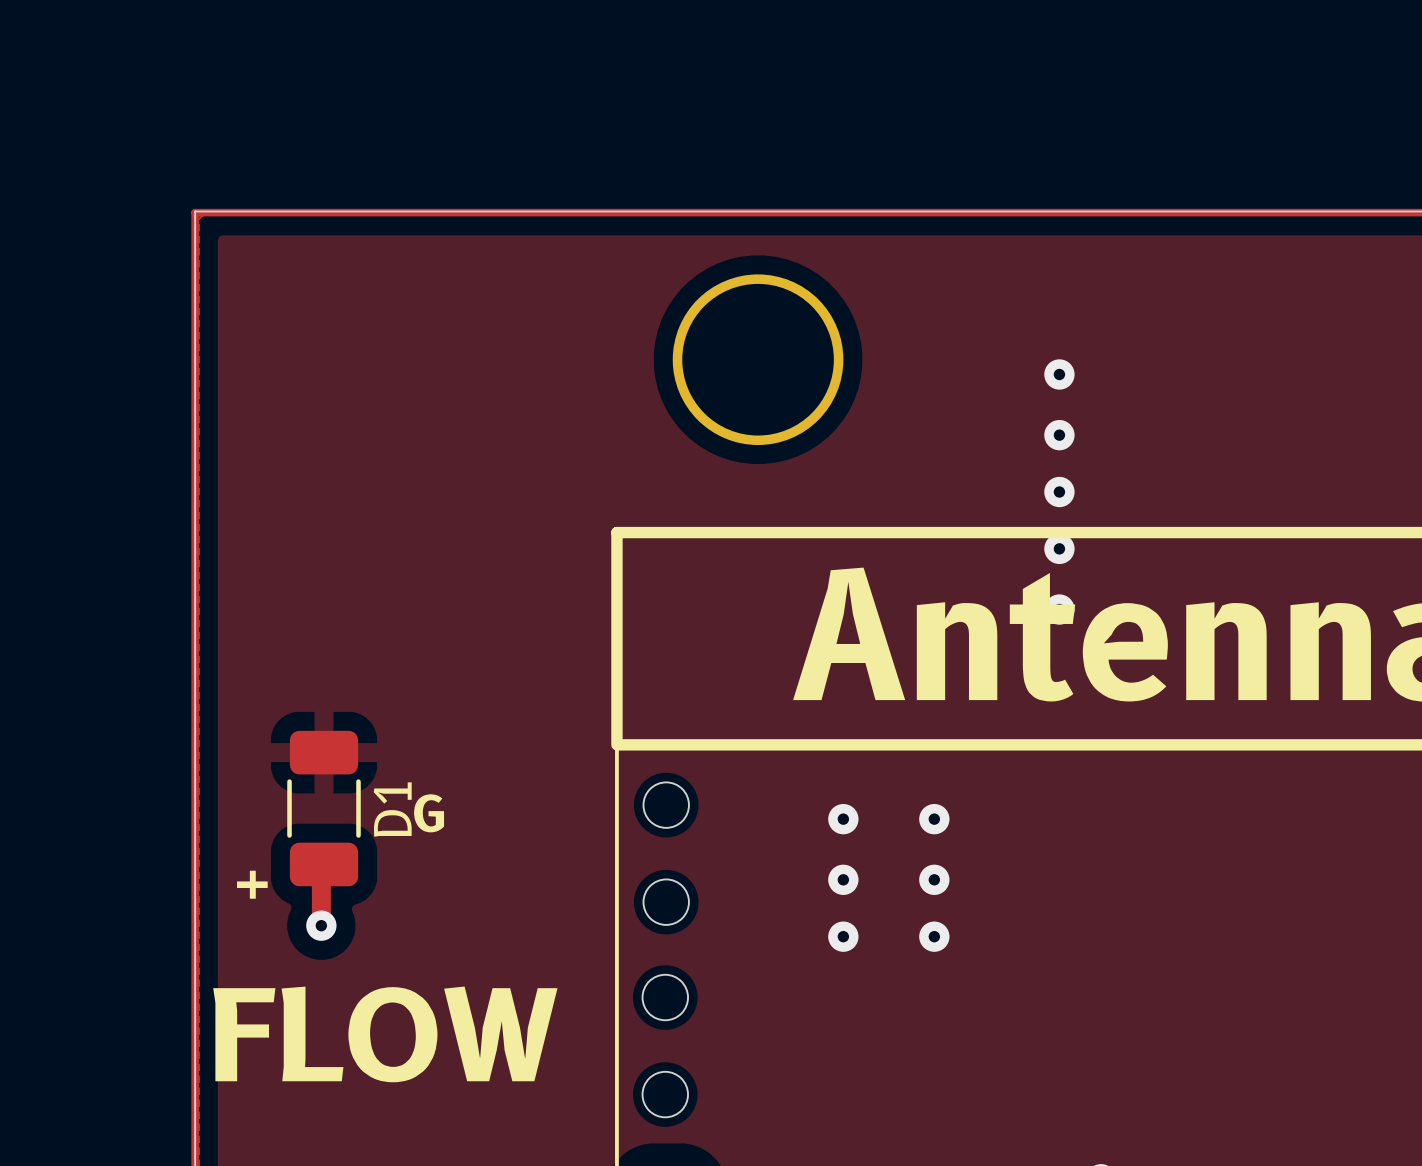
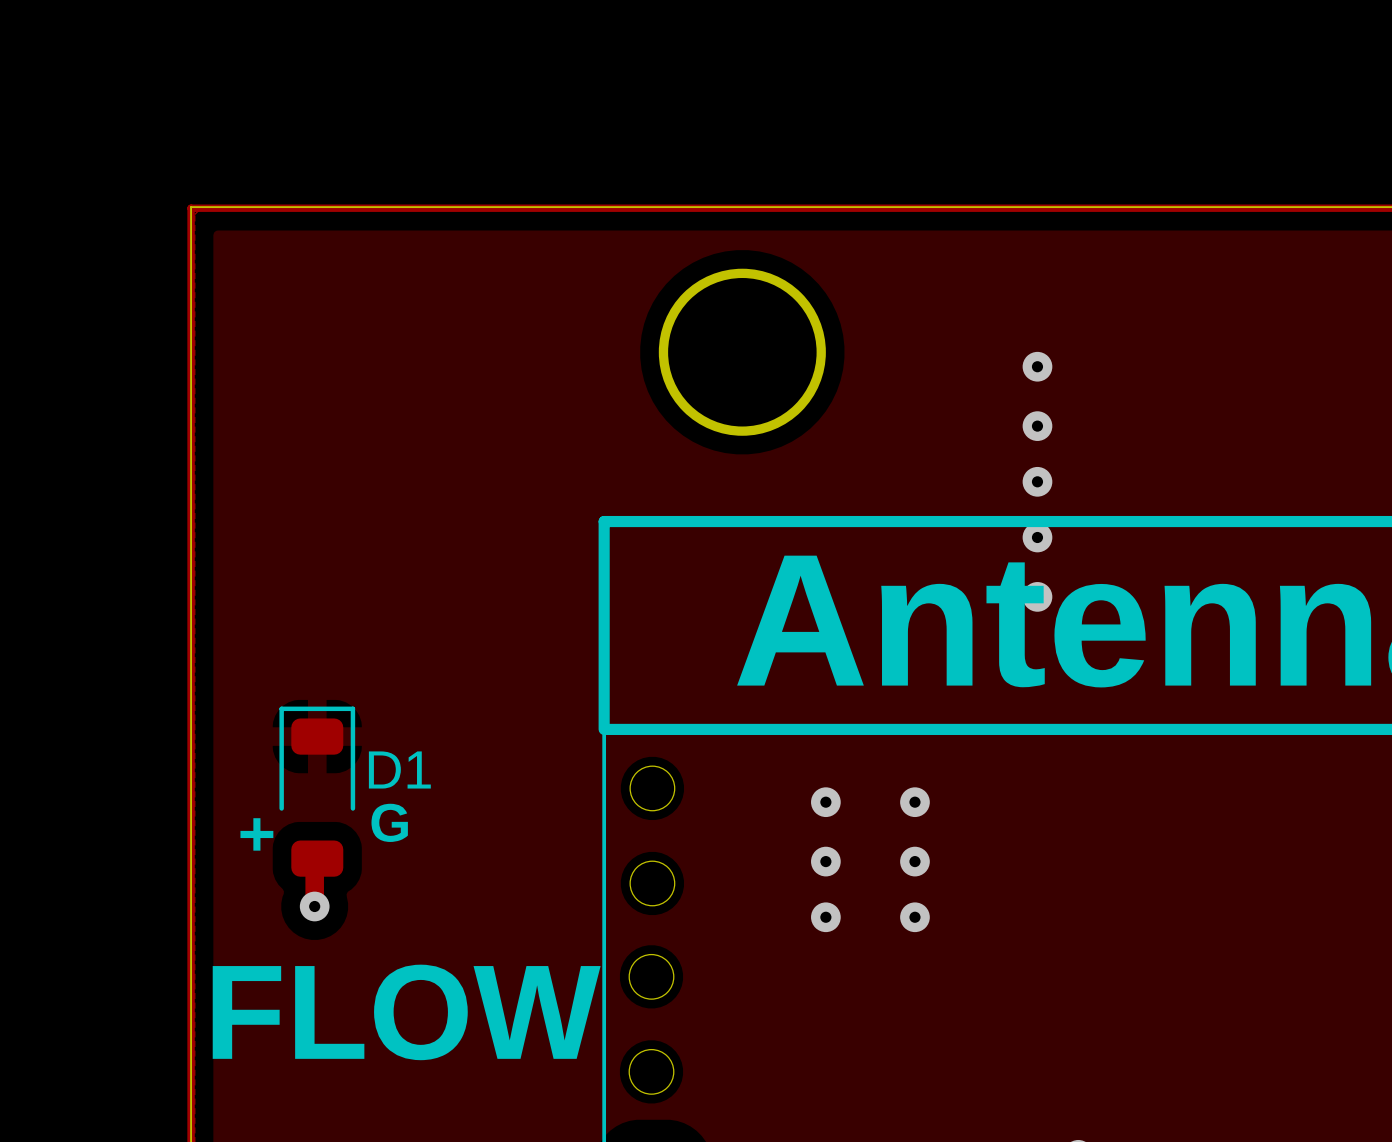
D1 footprint: [287, 730, 361, 887] -> [279, 706, 356, 877]
text position: G (429, 813) -> G (389, 822)
text position: + (252, 884) -> + (256, 834)

